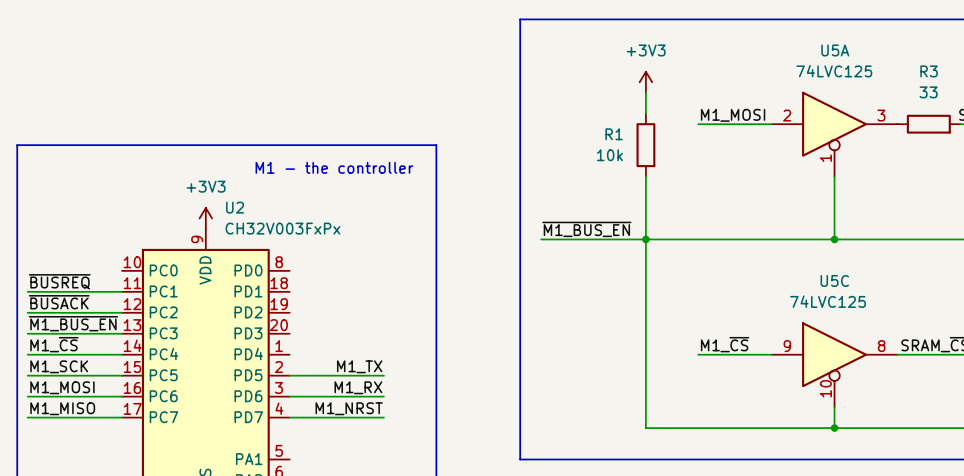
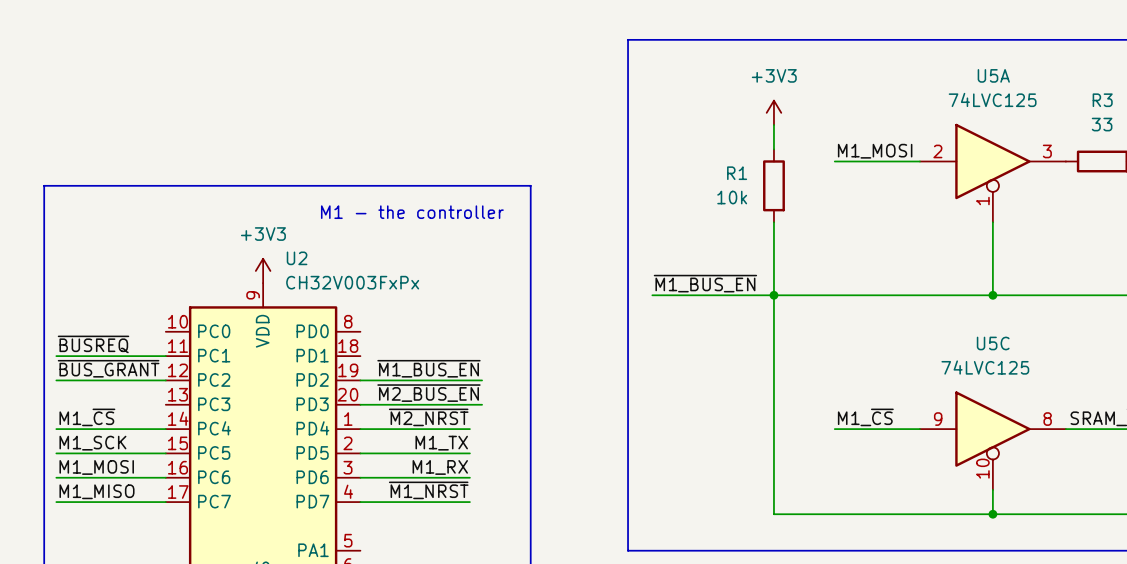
label: ~{BUSACK} (59, 302) -> ~{BUS_GRANT} (108, 368)
label: none -> ~{M1_BUS_EN} (428, 368)
wire: none -> (360, 380) (482, 380)
label: ~{M1_BUS_EN} (73, 323) -> none
label: none -> ~{M2_BUS_EN} (428, 393)
wire: (27, 333) (122, 333) -> none
wire: none -> (360, 404) (482, 404)
label: none -> ~{M2_NRST} (428, 417)
wire: none -> (360, 429) (469, 429)
label: M1_NRST (349, 408) -> ~{M1_NRST} (428, 490)

